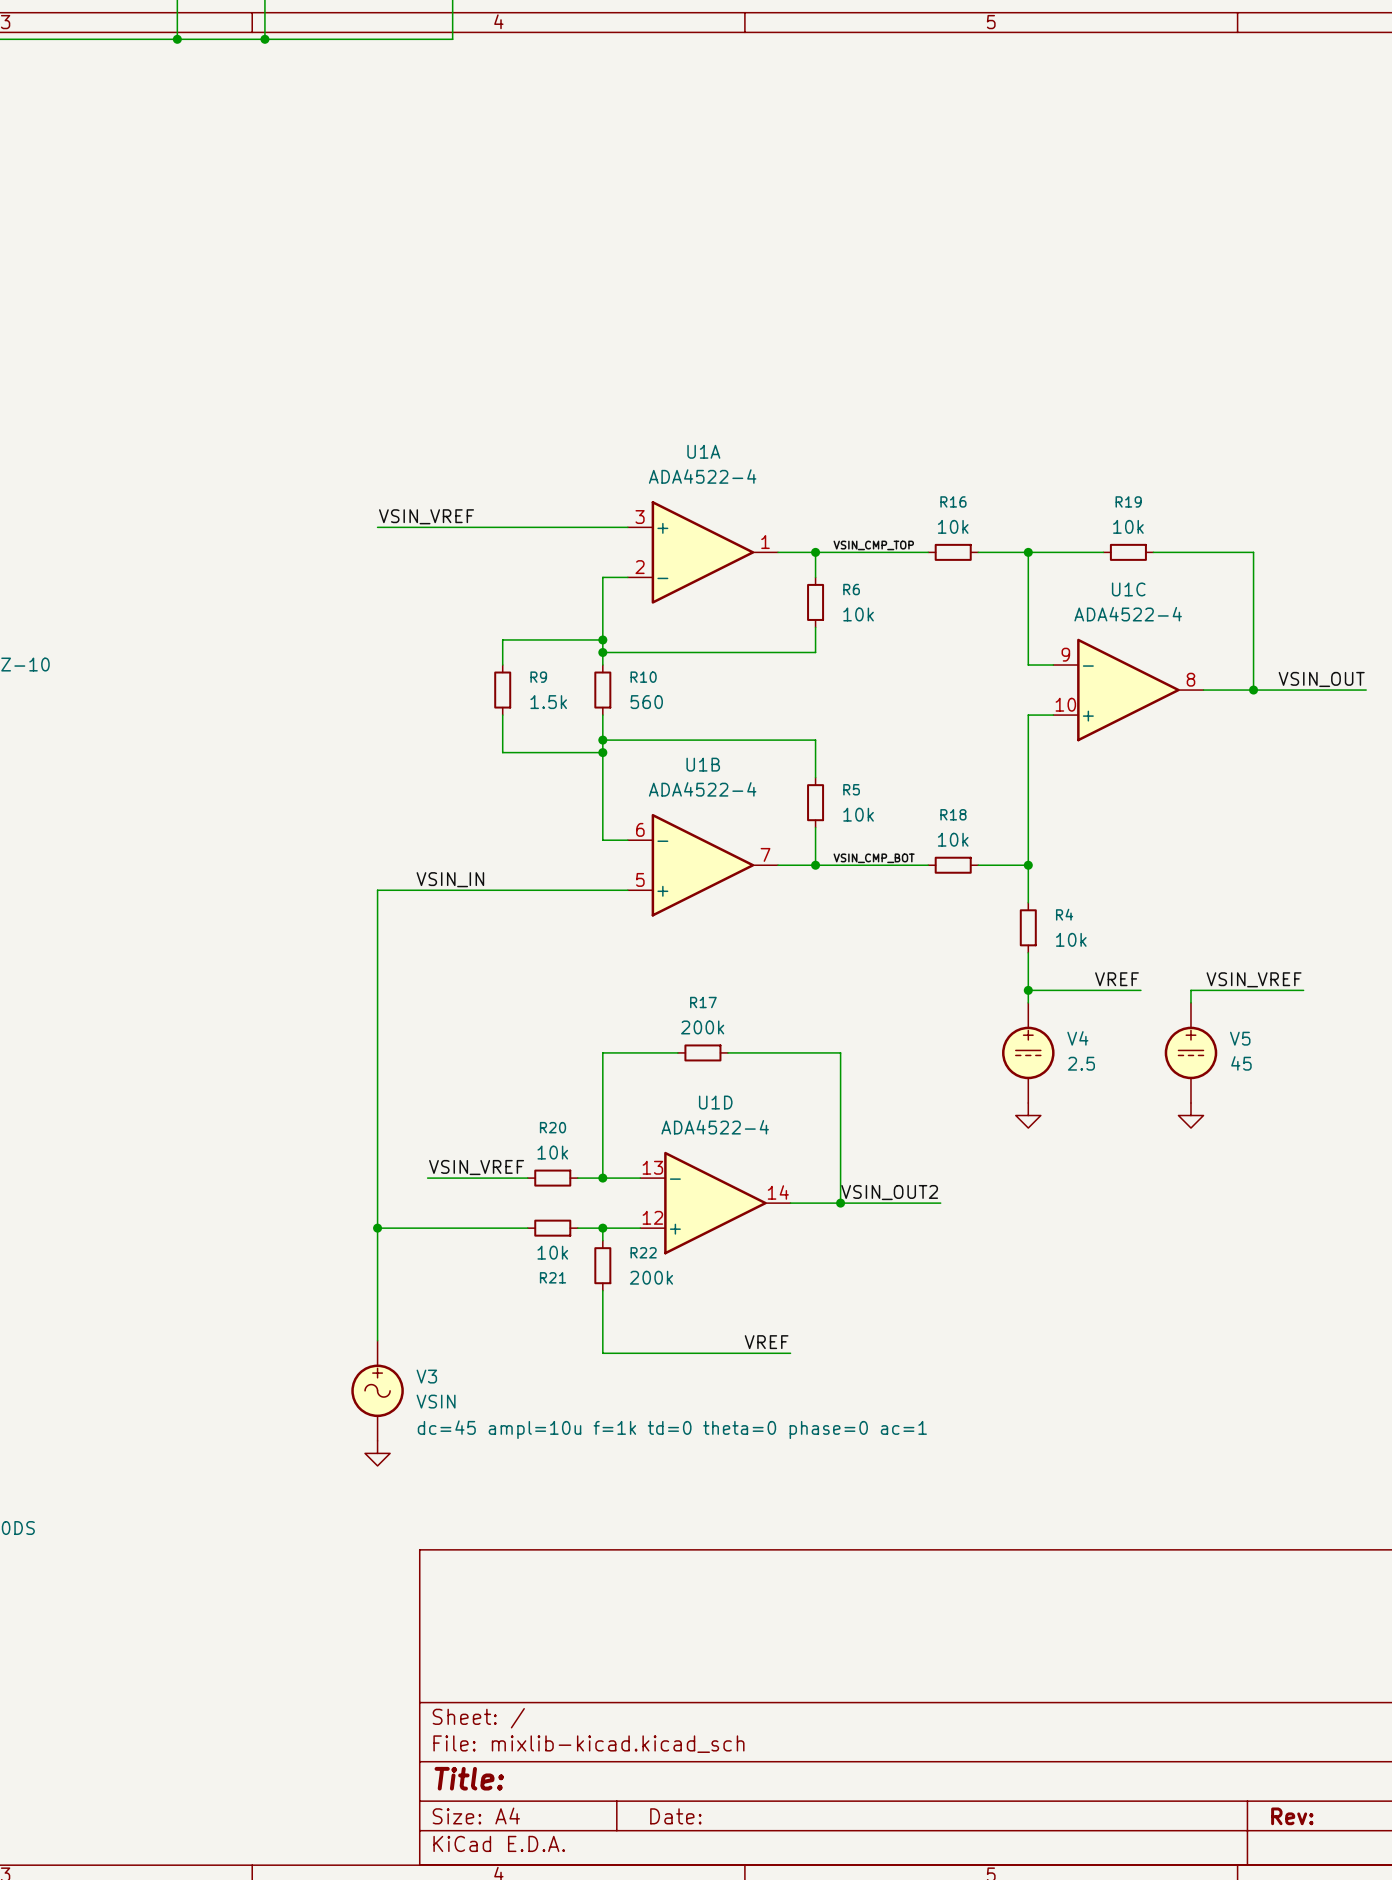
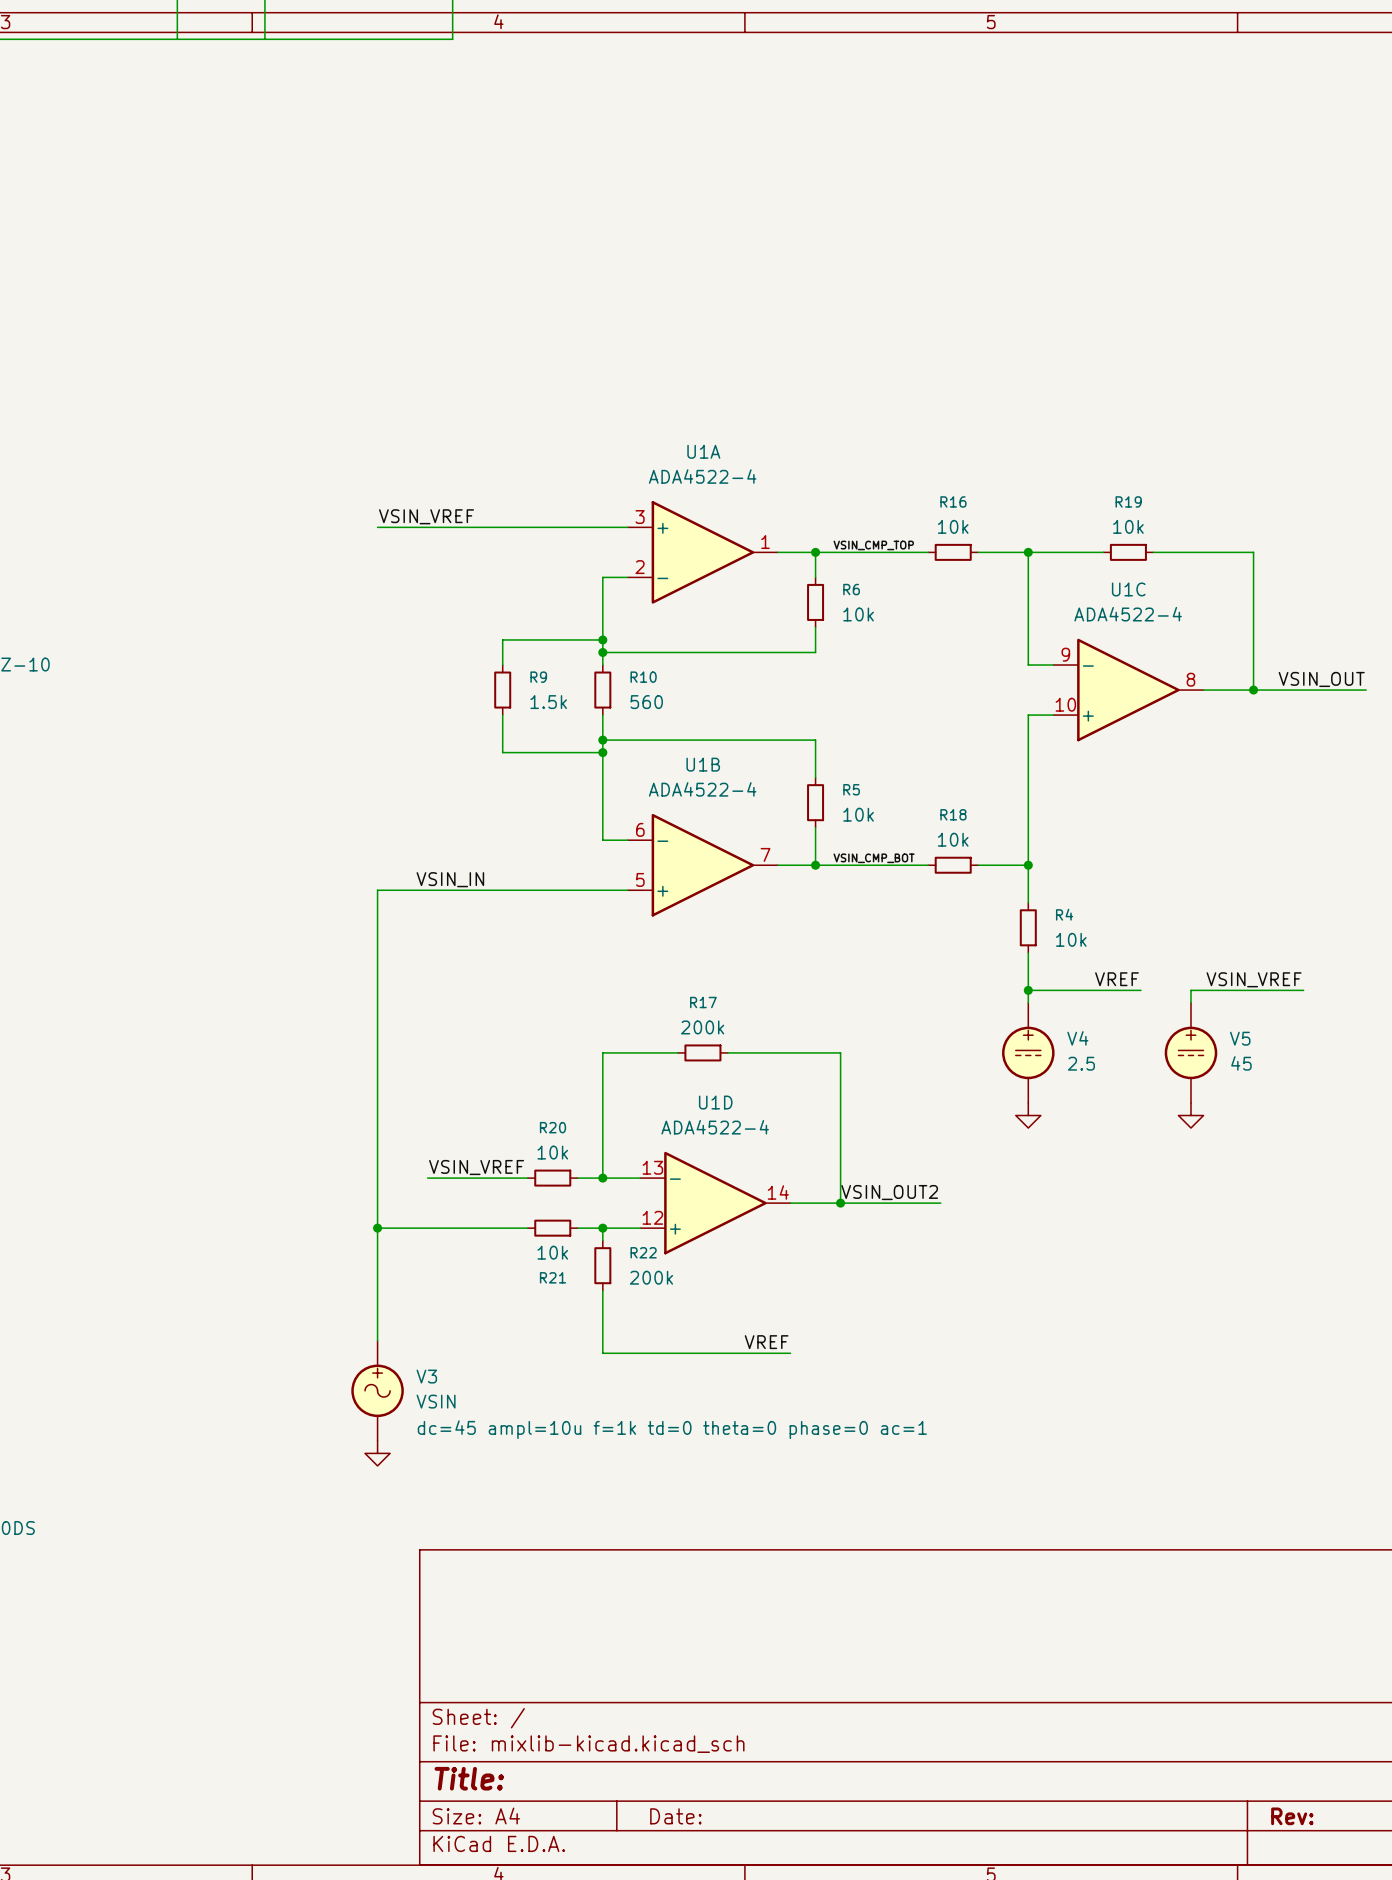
junction: (177, 39) -> none
junction: (264, 39) -> none

